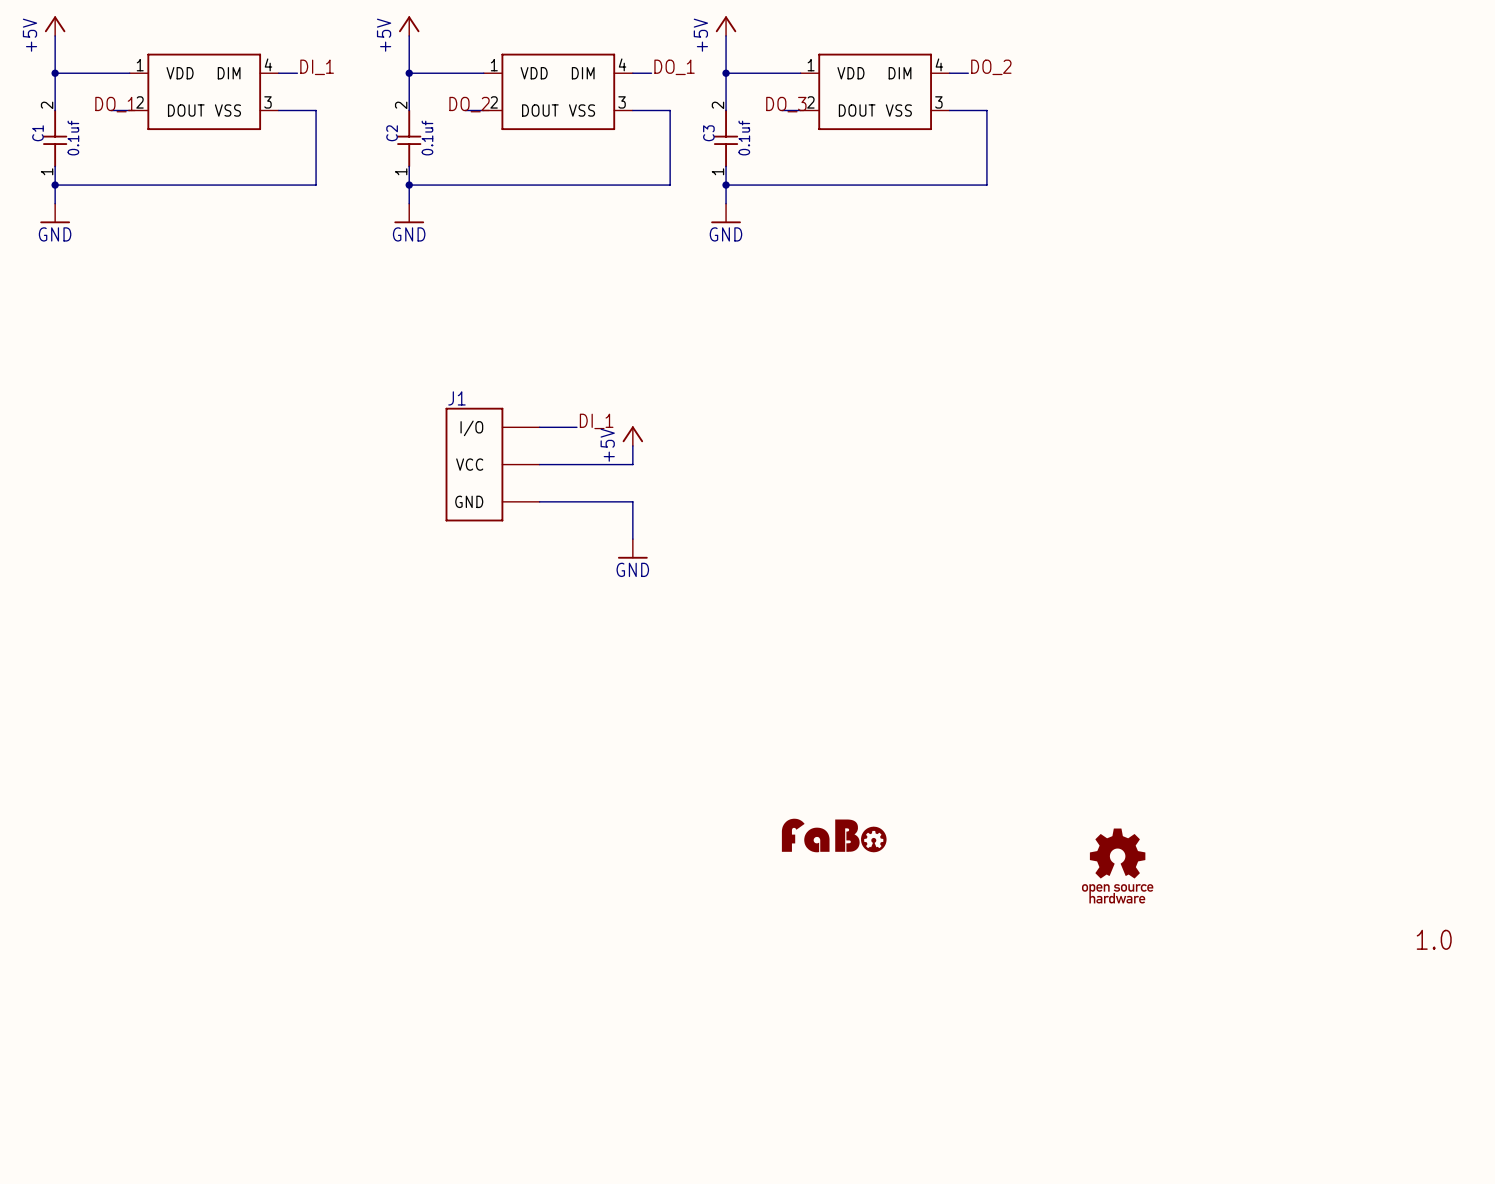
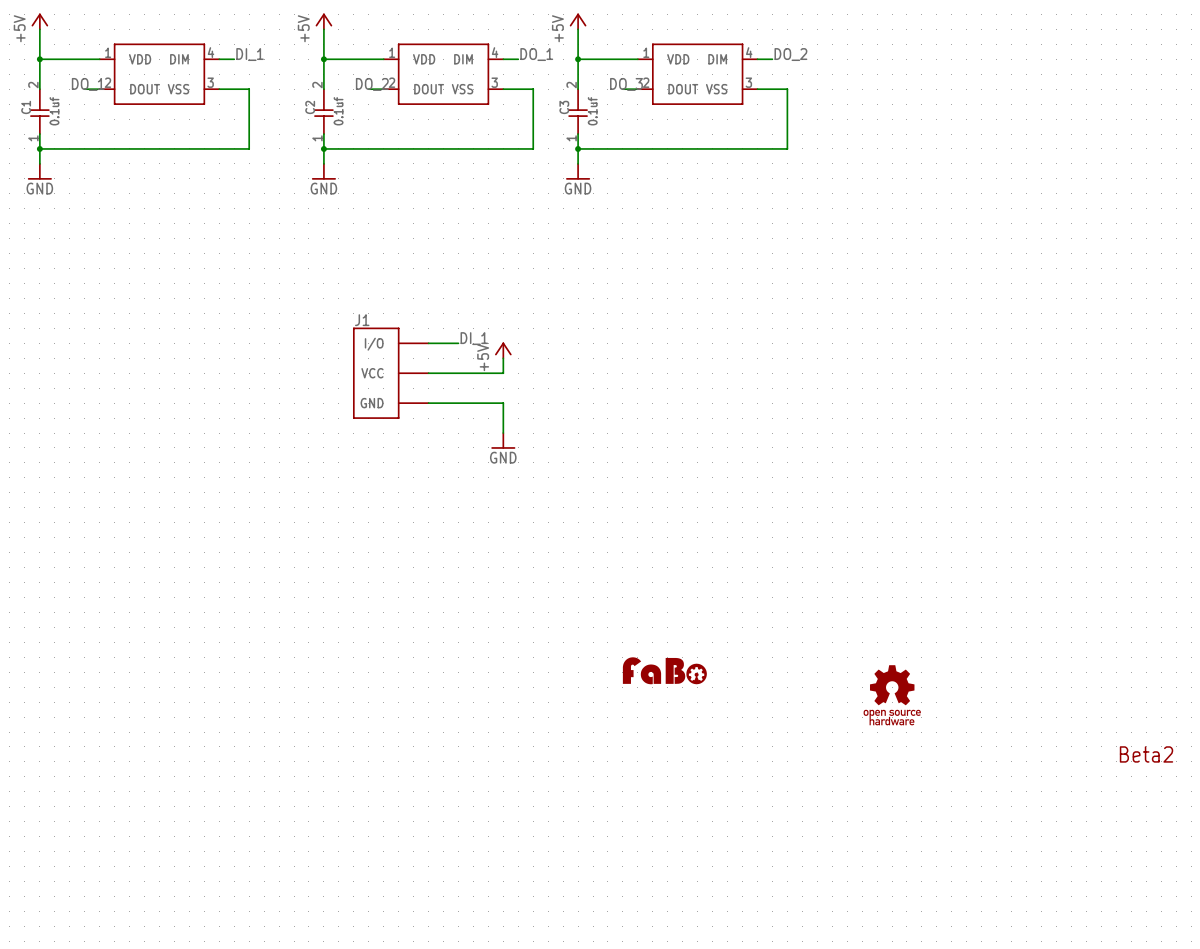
text: 1.0 (1434, 939) -> Beta2 (1146, 754)

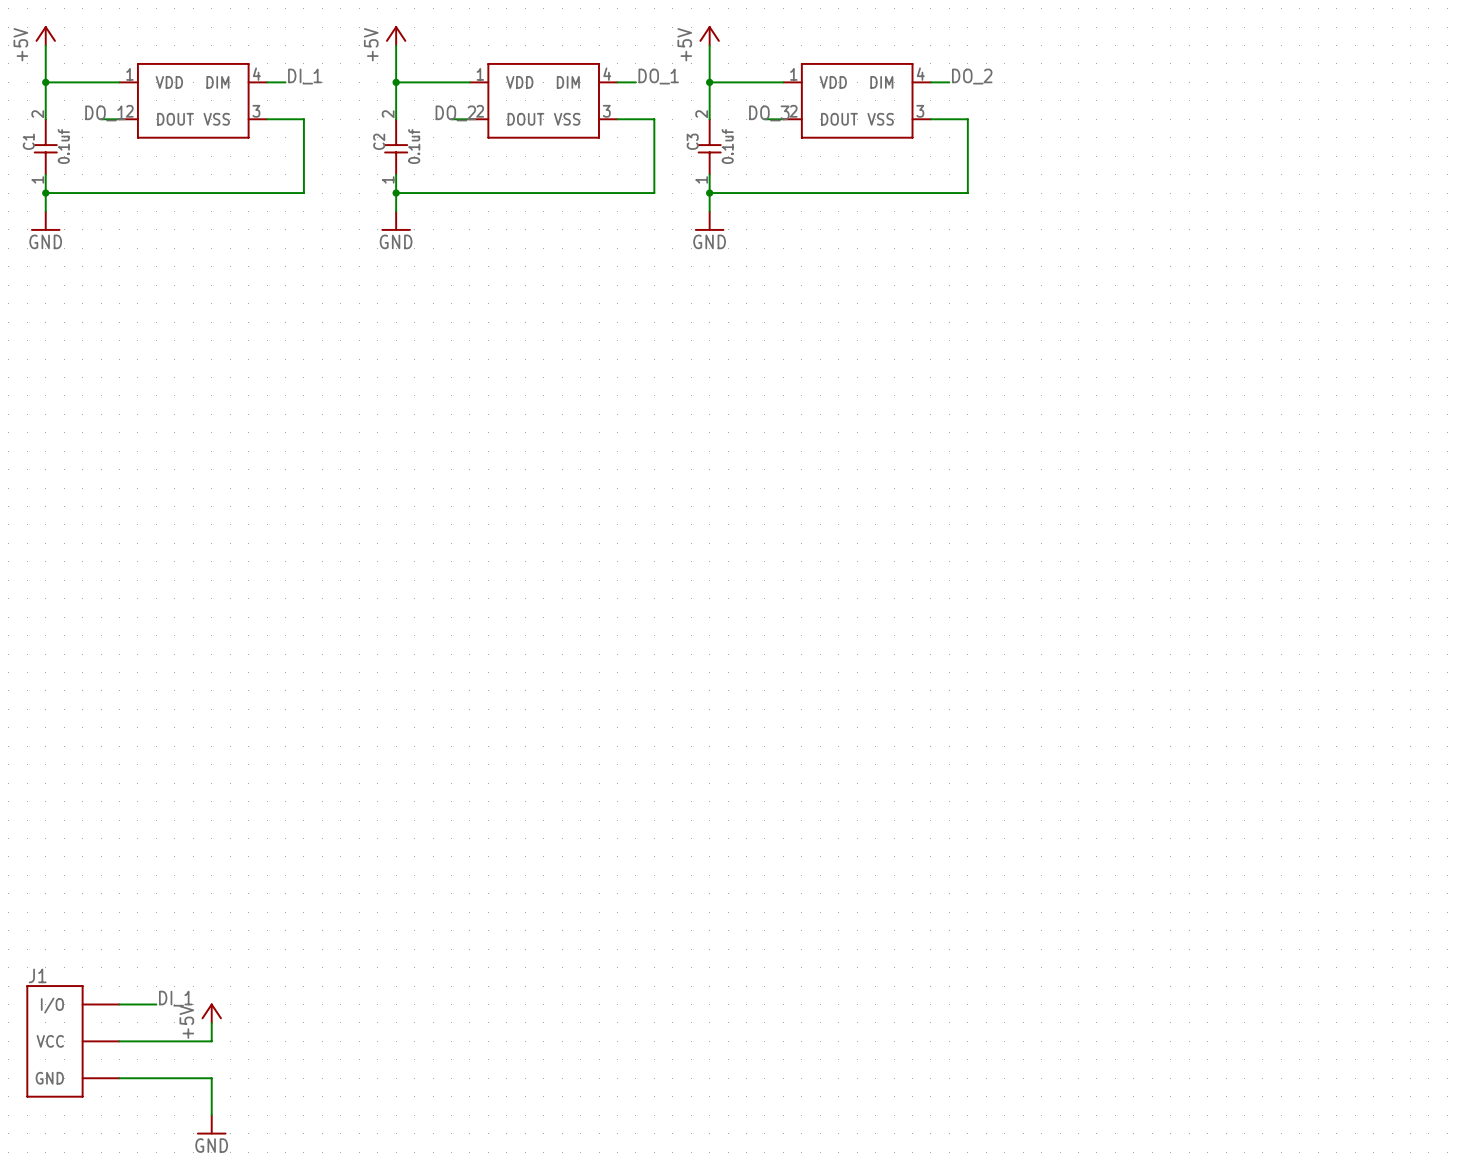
label: DI_1 (474, 338) -> none
wire: (428, 343) (458, 343) -> none
power symbol: +5V (503, 350) -> none
wire: (503, 358) (503, 373) (428, 373) -> none
J1 position: (390, 373) -> (72, 1041)
wire: (428, 403) (503, 403) (503, 433) -> none
power symbol: GND (503, 440) -> none
part: (664, 670) -> none
part: (892, 695) -> none
text: Beta2 (1146, 754) -> none
label: none -> DI_1 (175, 998)
wire: none -> (119, 1004) (156, 1004)
power symbol: none -> +5V (211, 1013)
wire: none -> (211, 1022) (211, 1041) (119, 1041)
wire: none -> (119, 1078) (211, 1078) (211, 1115)
power symbol: none -> GND (211, 1124)

